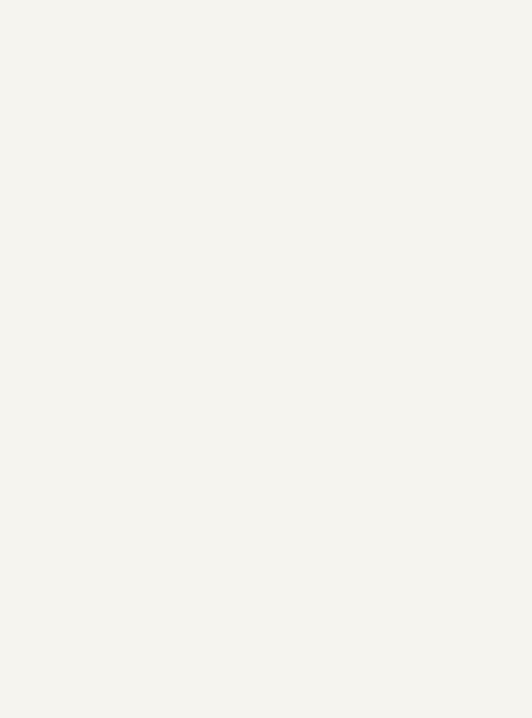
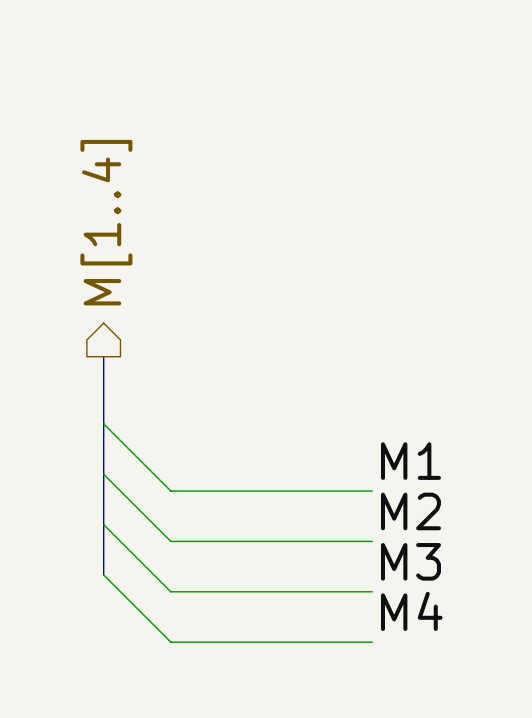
hierarchical label: none -> M[1..4] (106, 222)
bus: none -> (103, 356) (103, 575)
wire: none -> (103, 423) (170, 491) (372, 491)
label: none -> M1 (410, 461)
wire: none -> (103, 474) (170, 541) (372, 541)
label: none -> M2 (410, 511)
wire: none -> (103, 524) (170, 591) (372, 591)
label: none -> M3 (410, 561)
wire: none -> (103, 575) (170, 642) (372, 642)
label: none -> M4 (411, 611)

